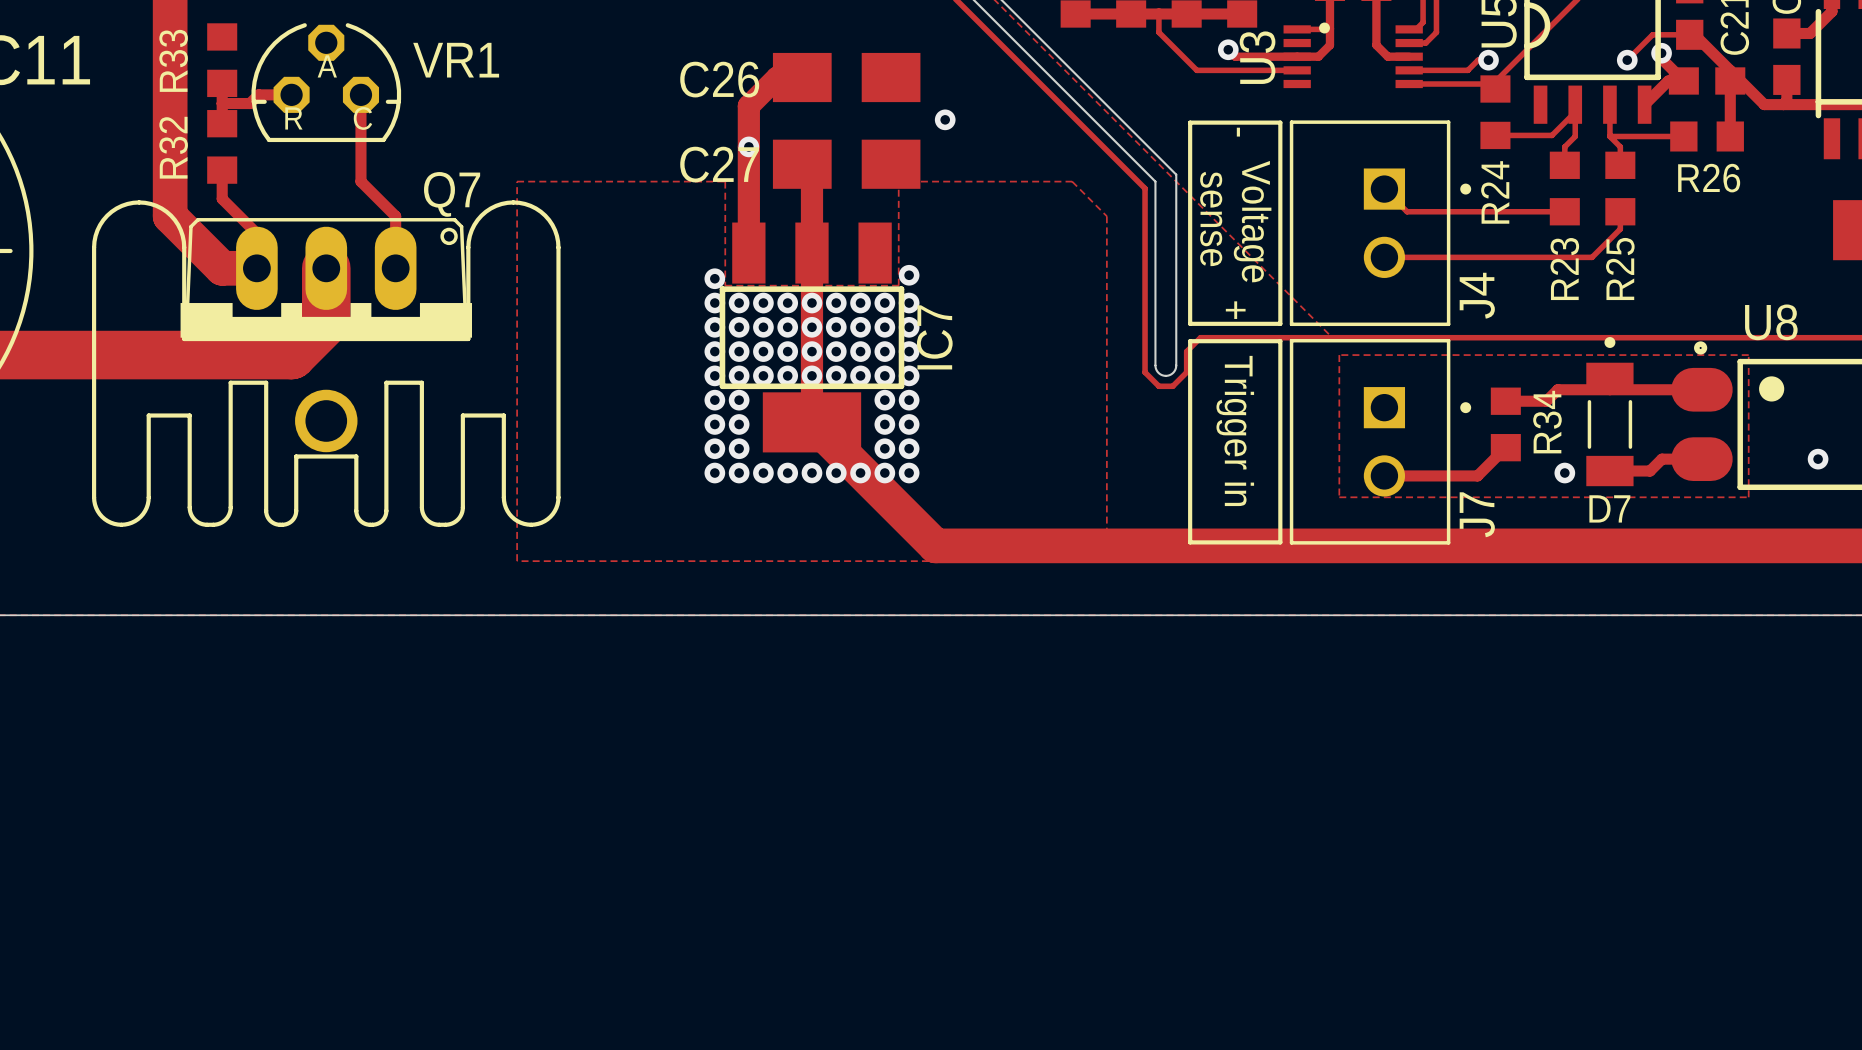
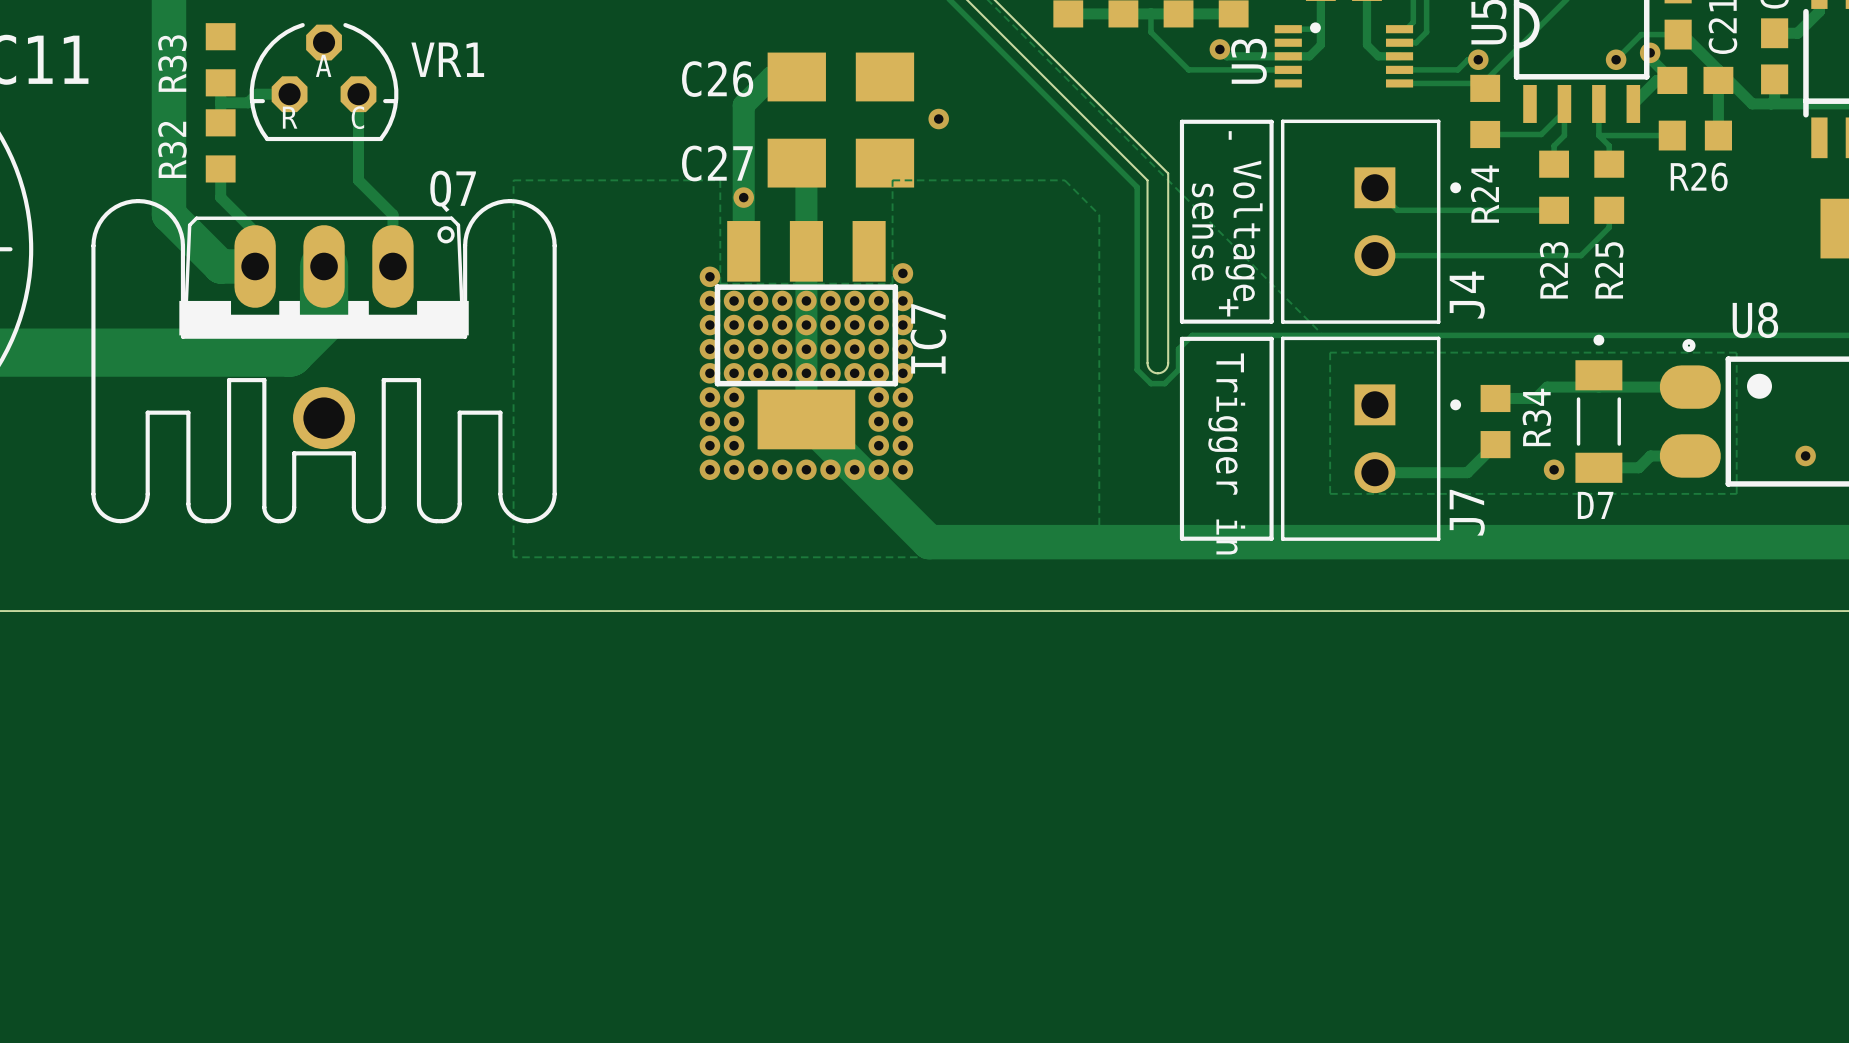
via position: (748, 146) -> (743, 197)

